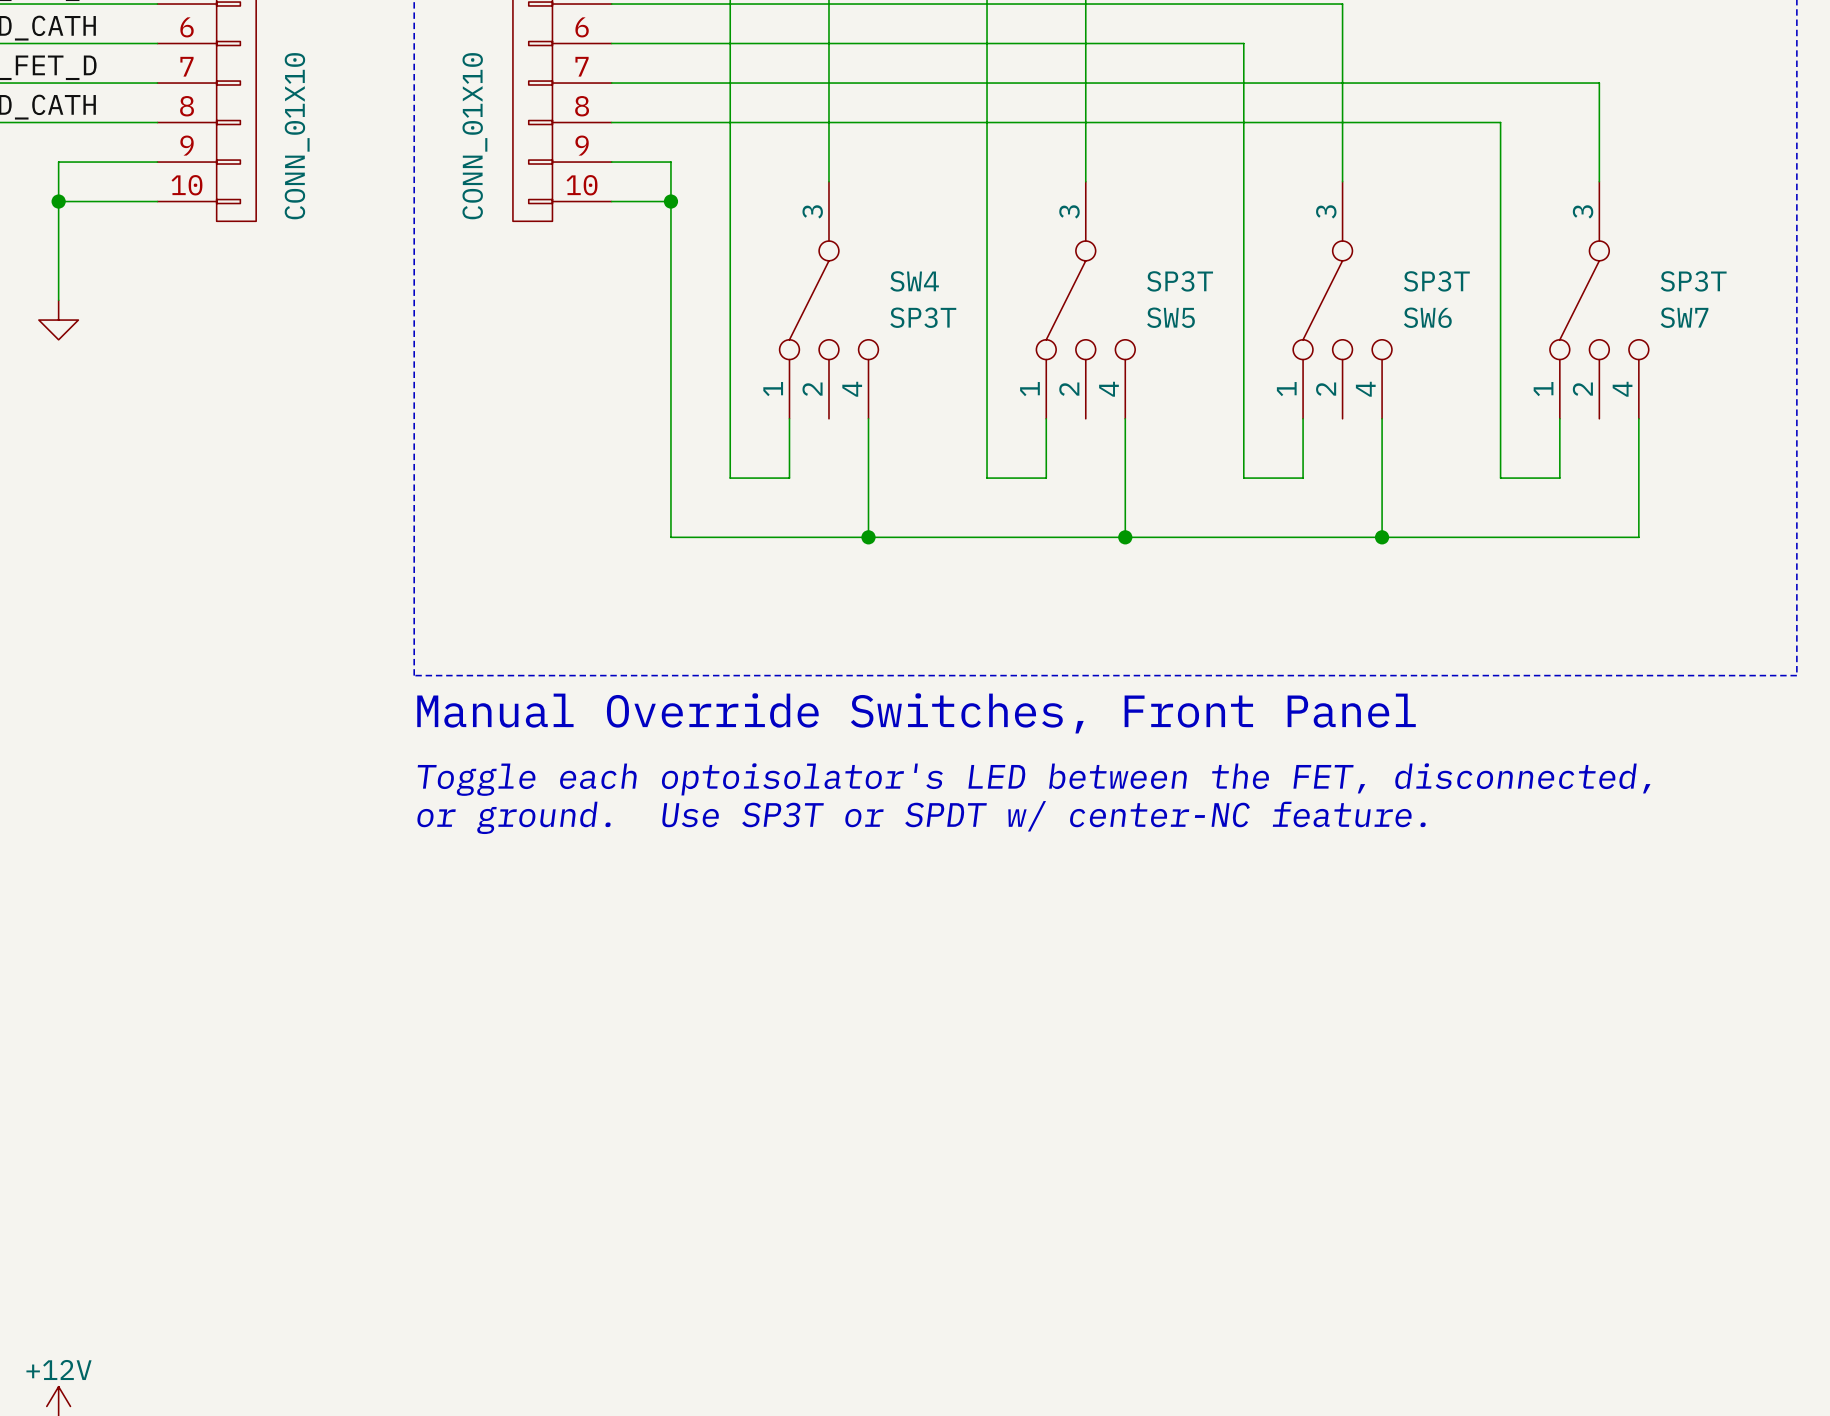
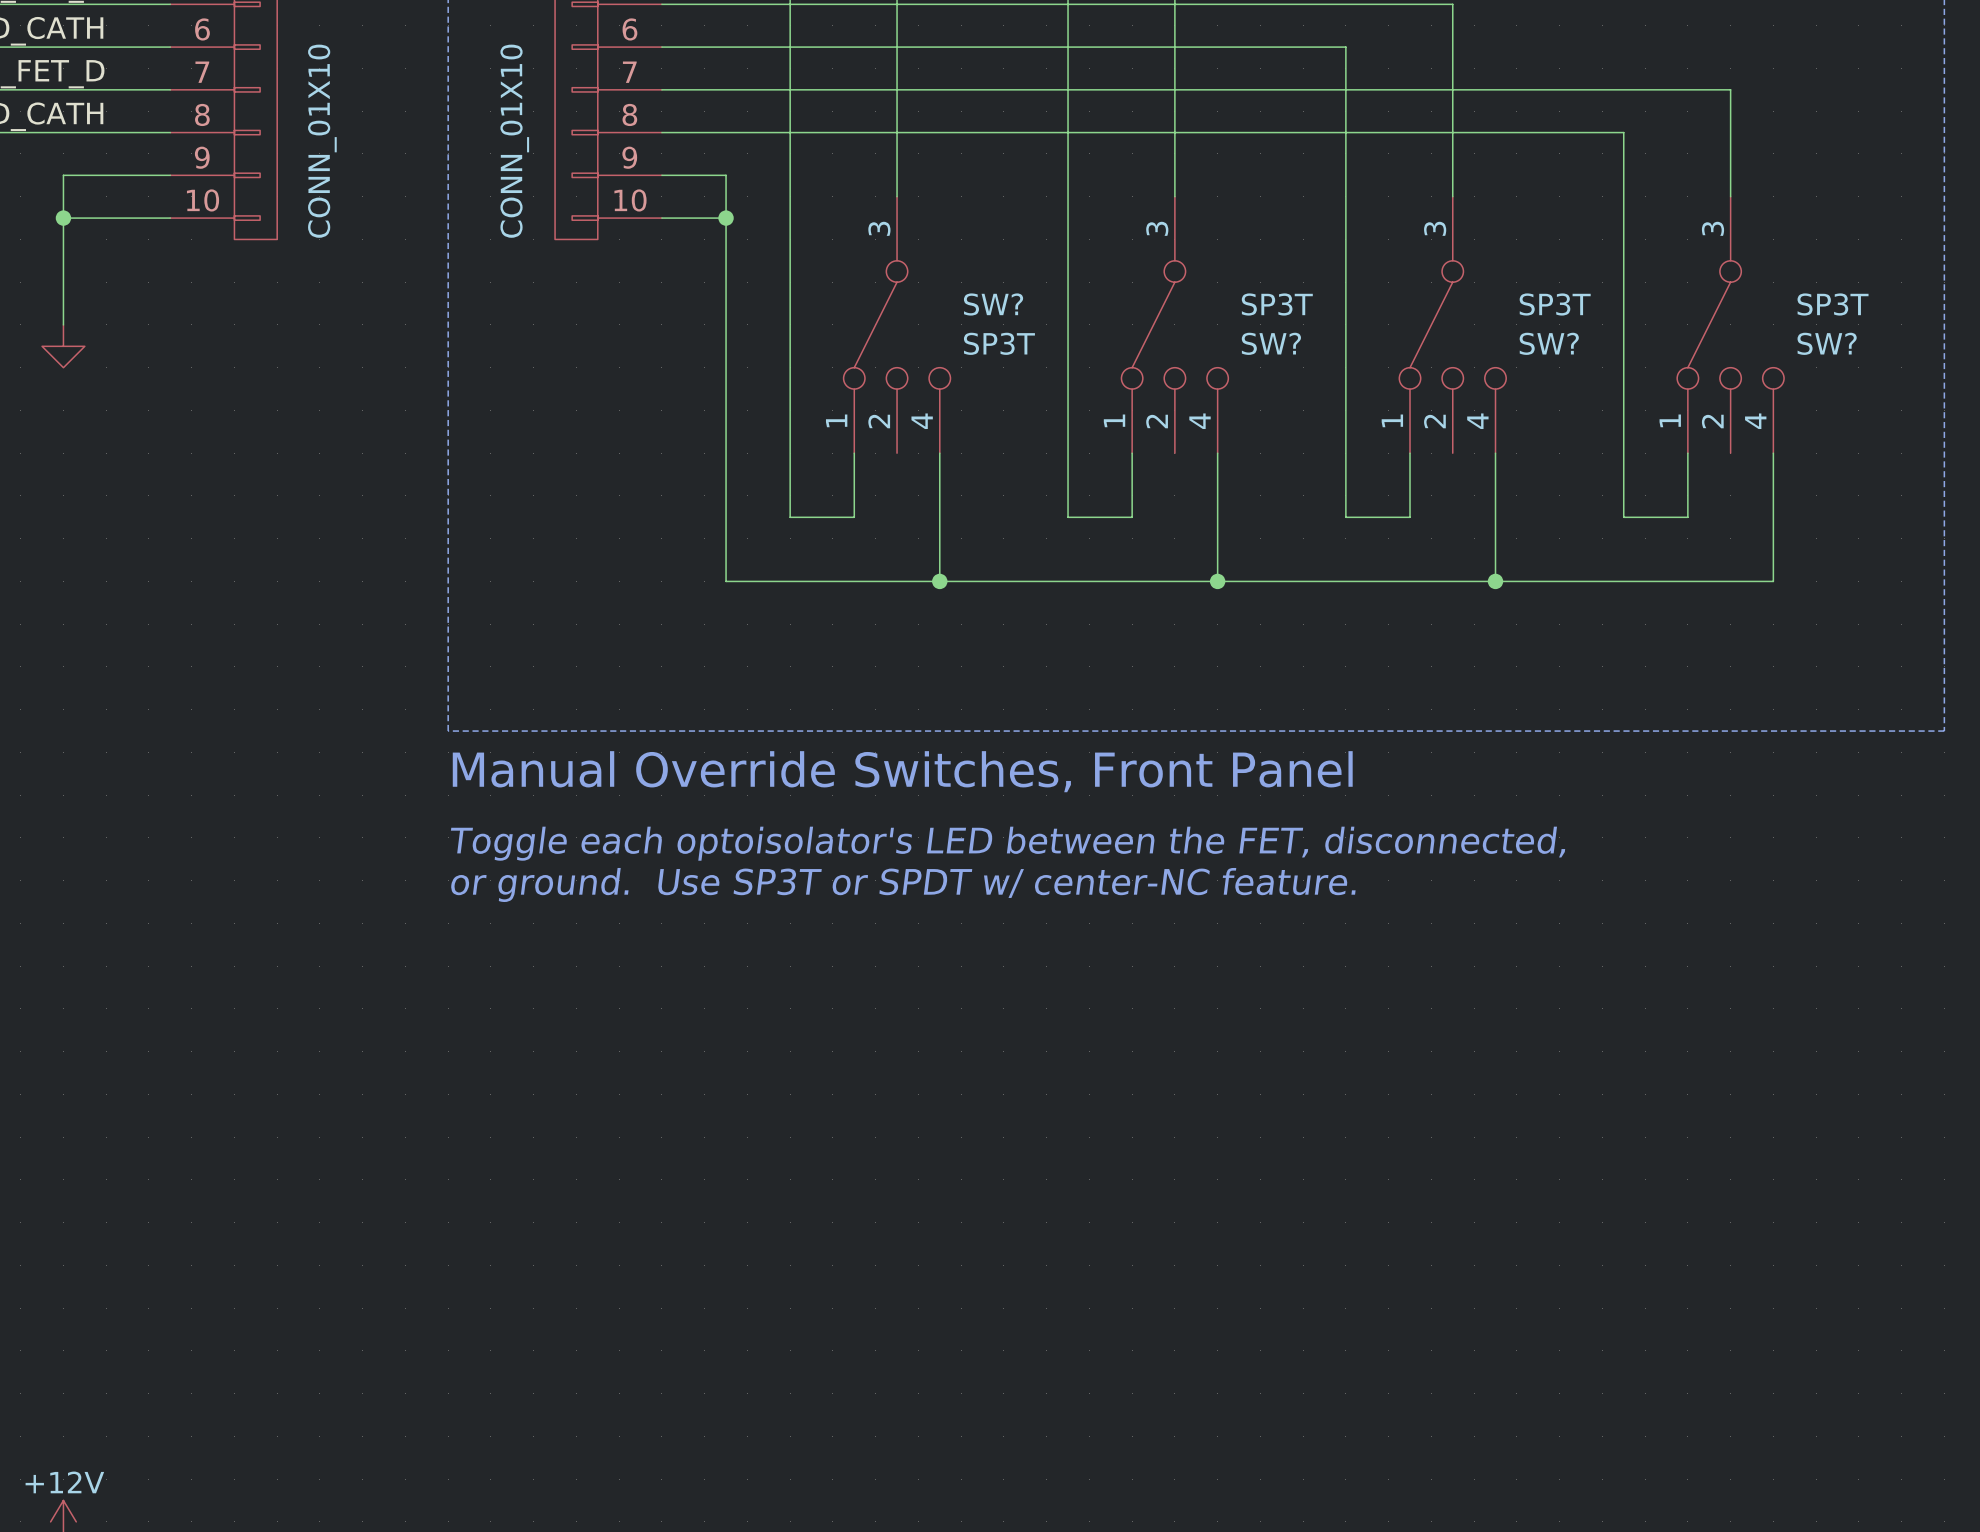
SW4 name: SW4 (914, 281) -> SW? (993, 304)
SW5 name: SW5 (1170, 317) -> SW? (1271, 343)
SW6 name: SW6 (1427, 317) -> SW? (1549, 343)
SW7 name: SW7 (1684, 317) -> SW? (1827, 343)

